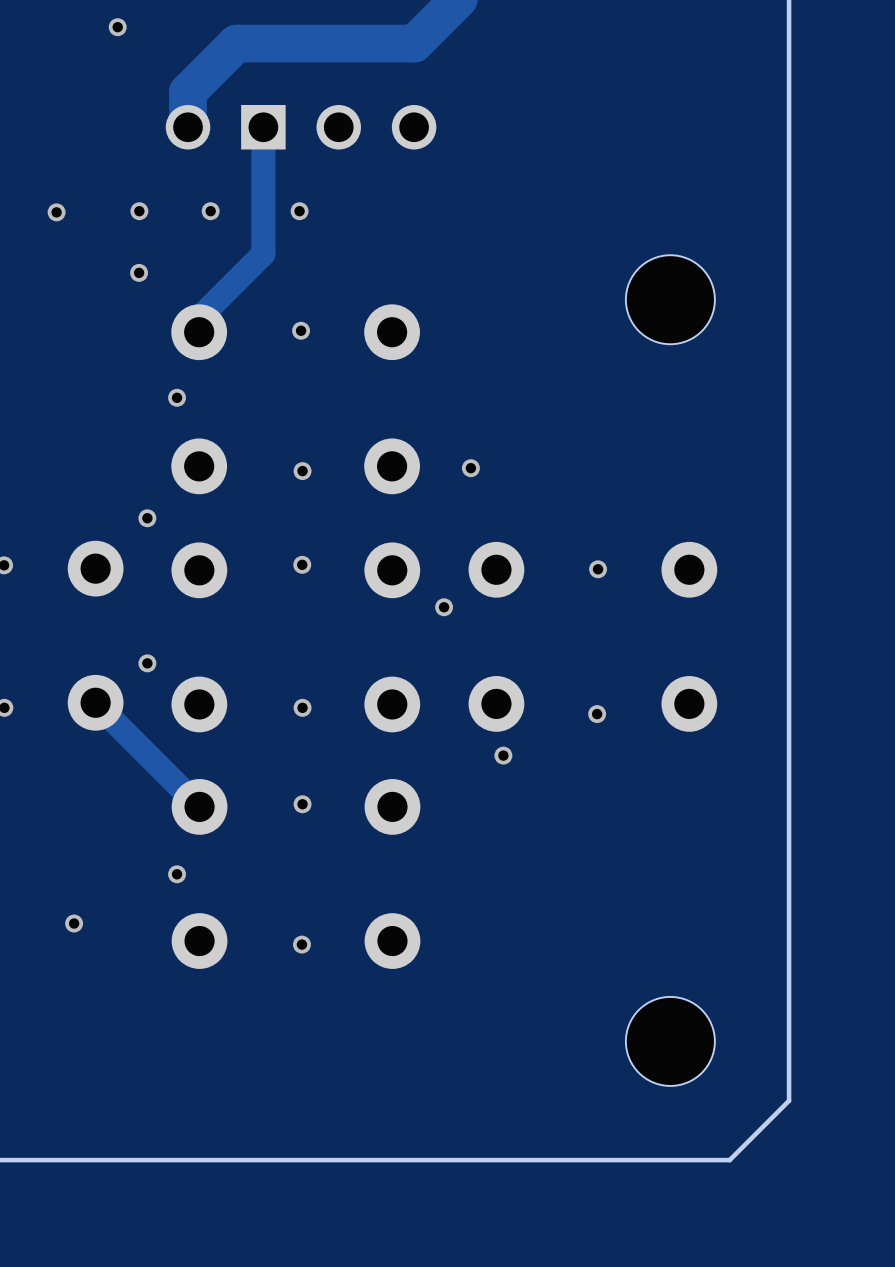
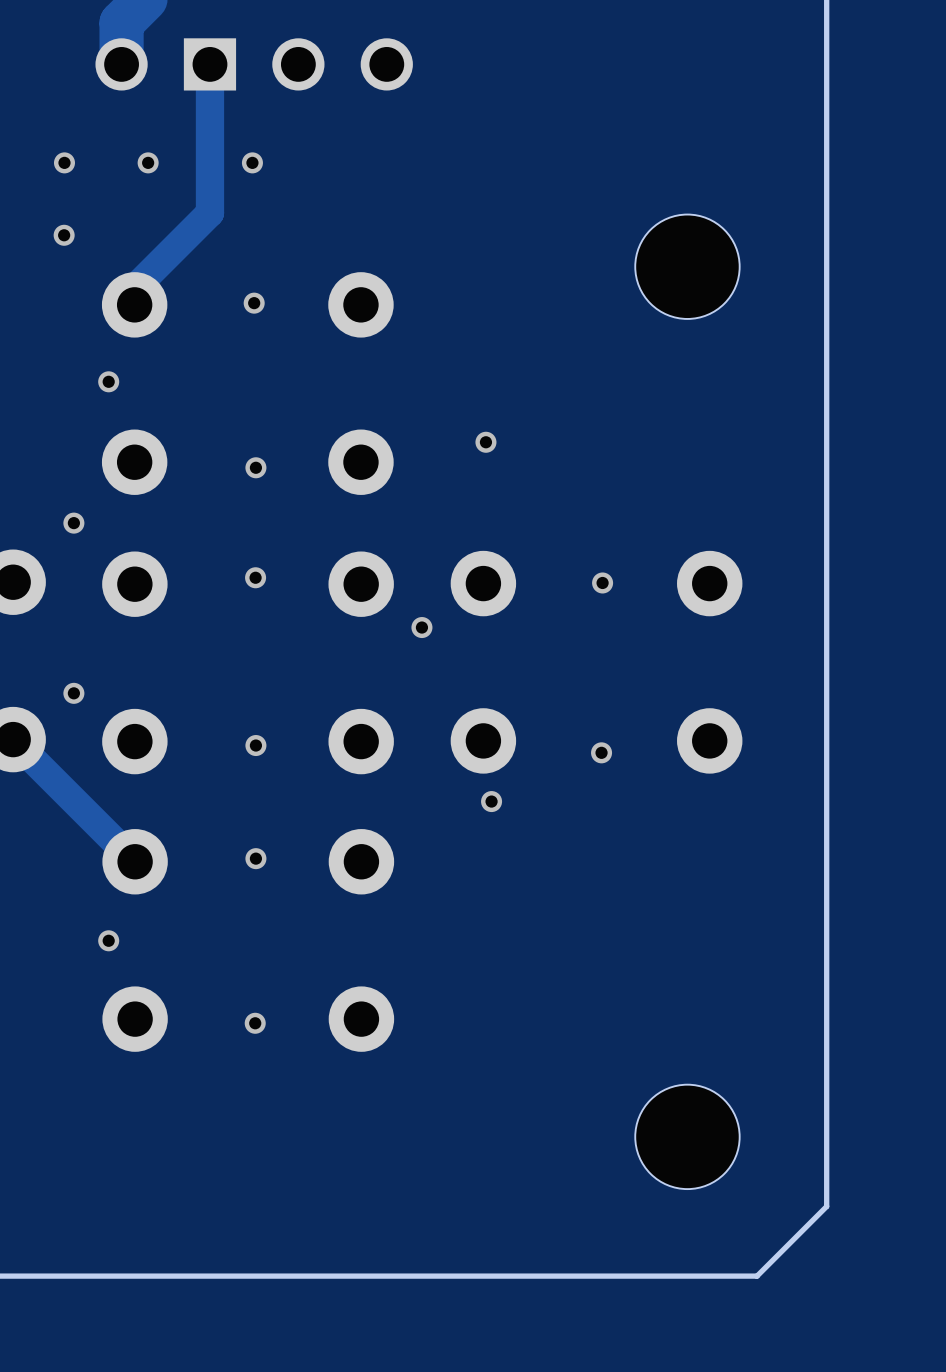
via position: (470, 468) -> (485, 442)

